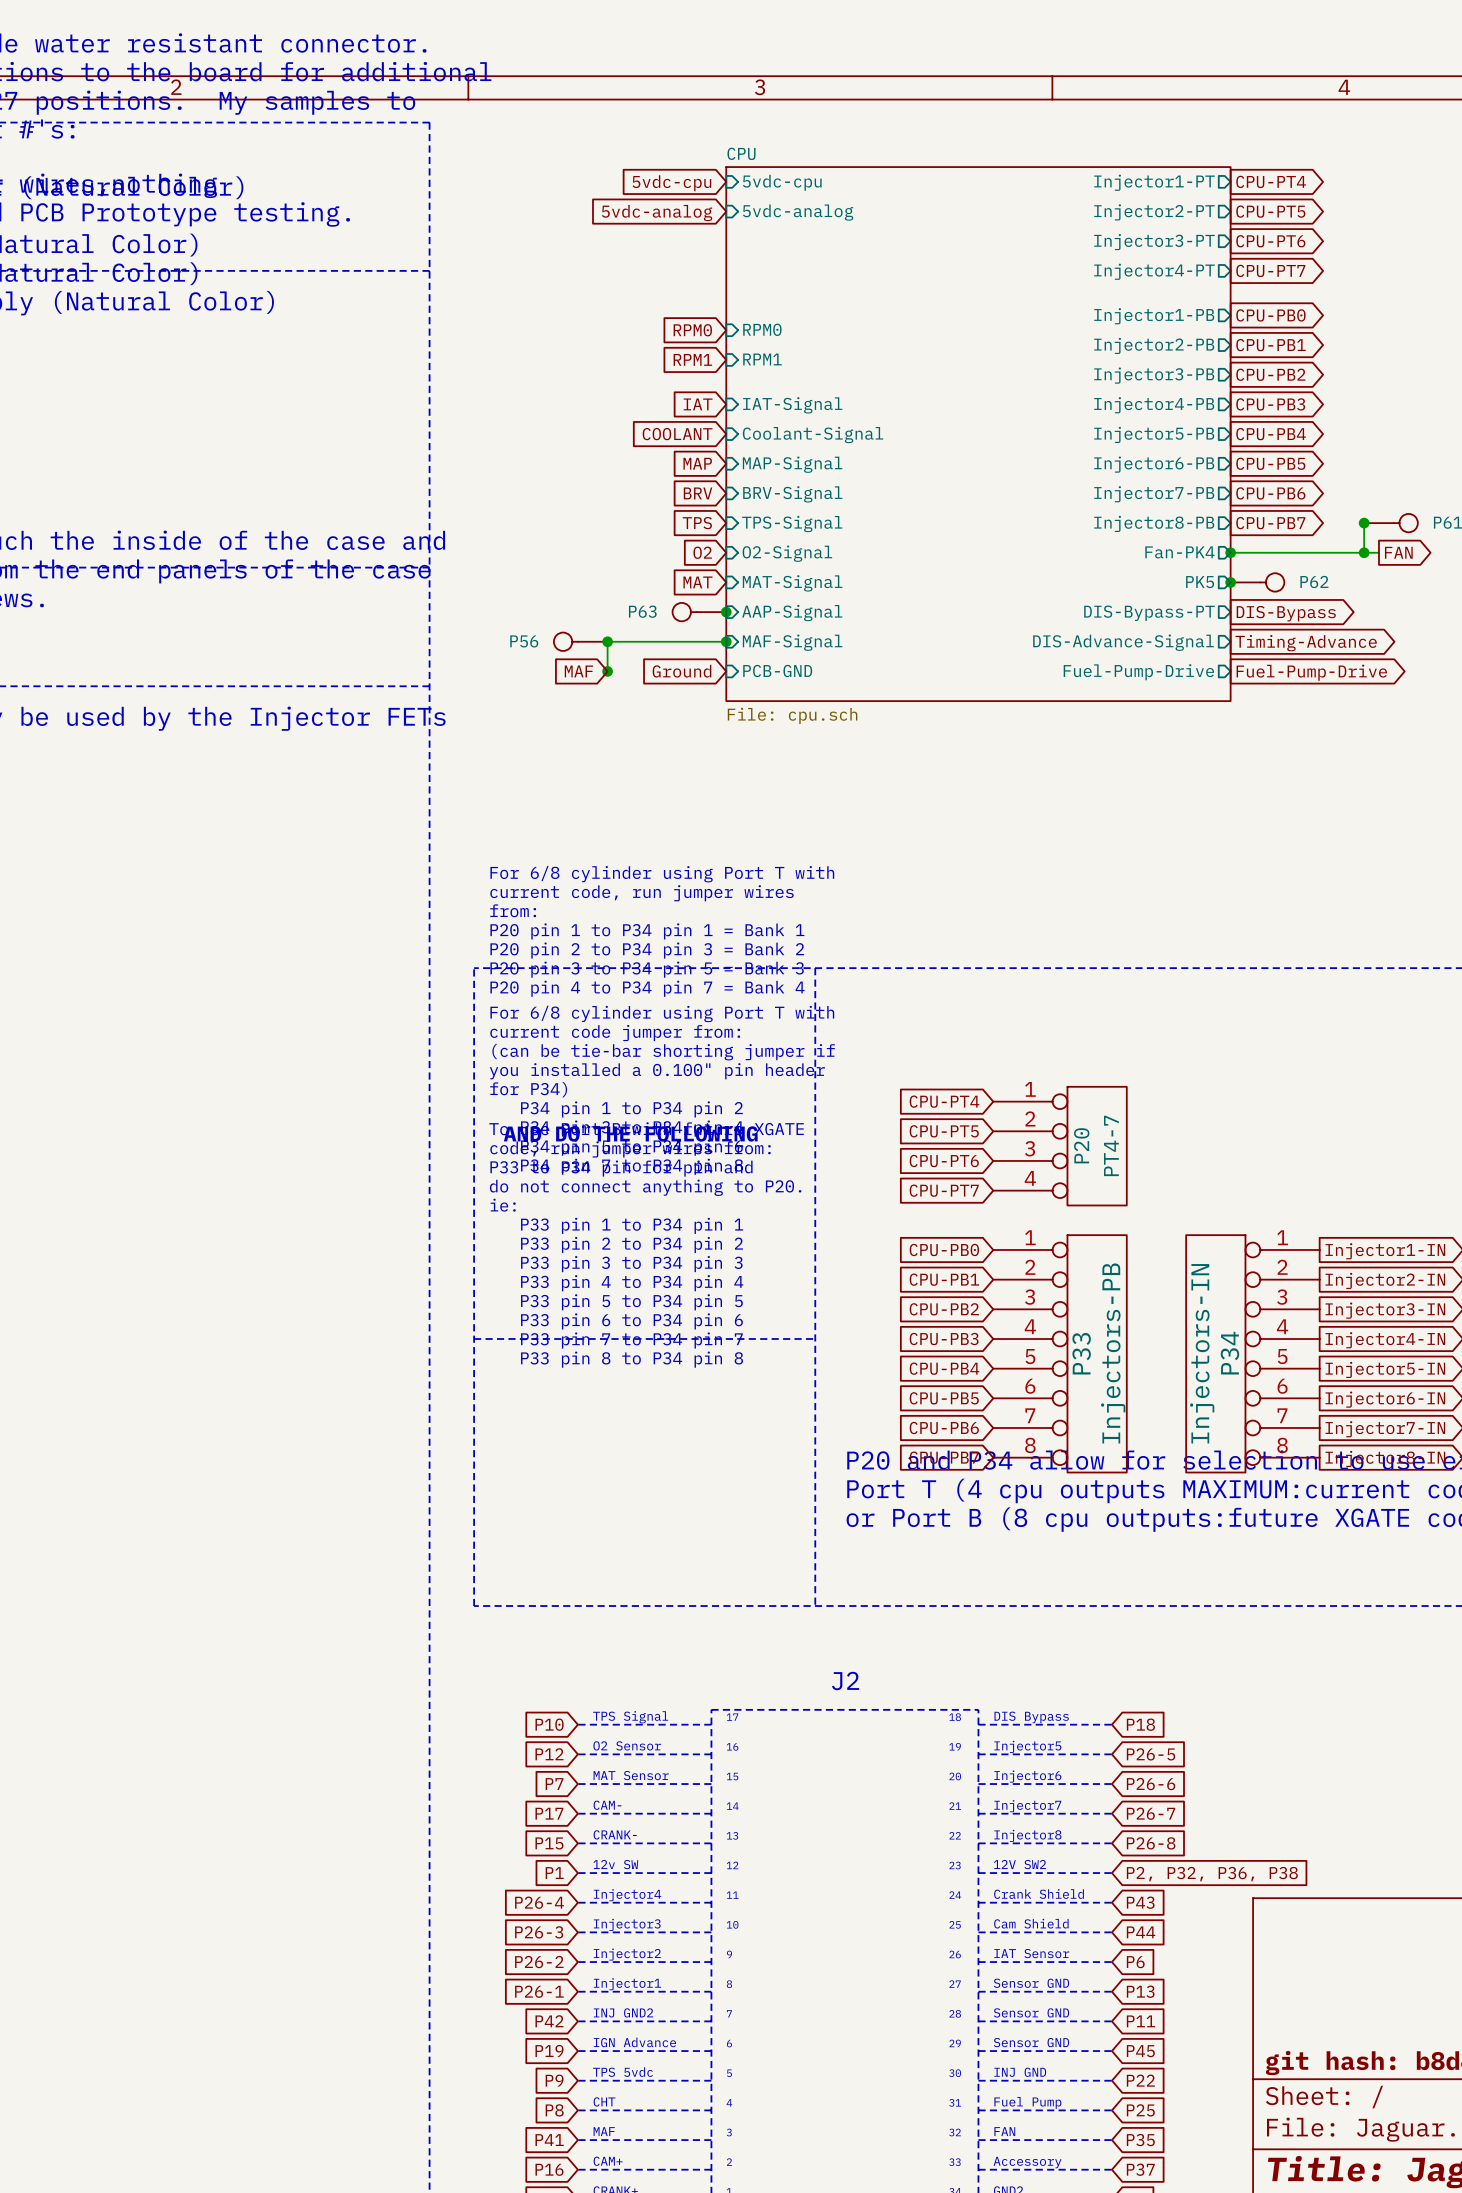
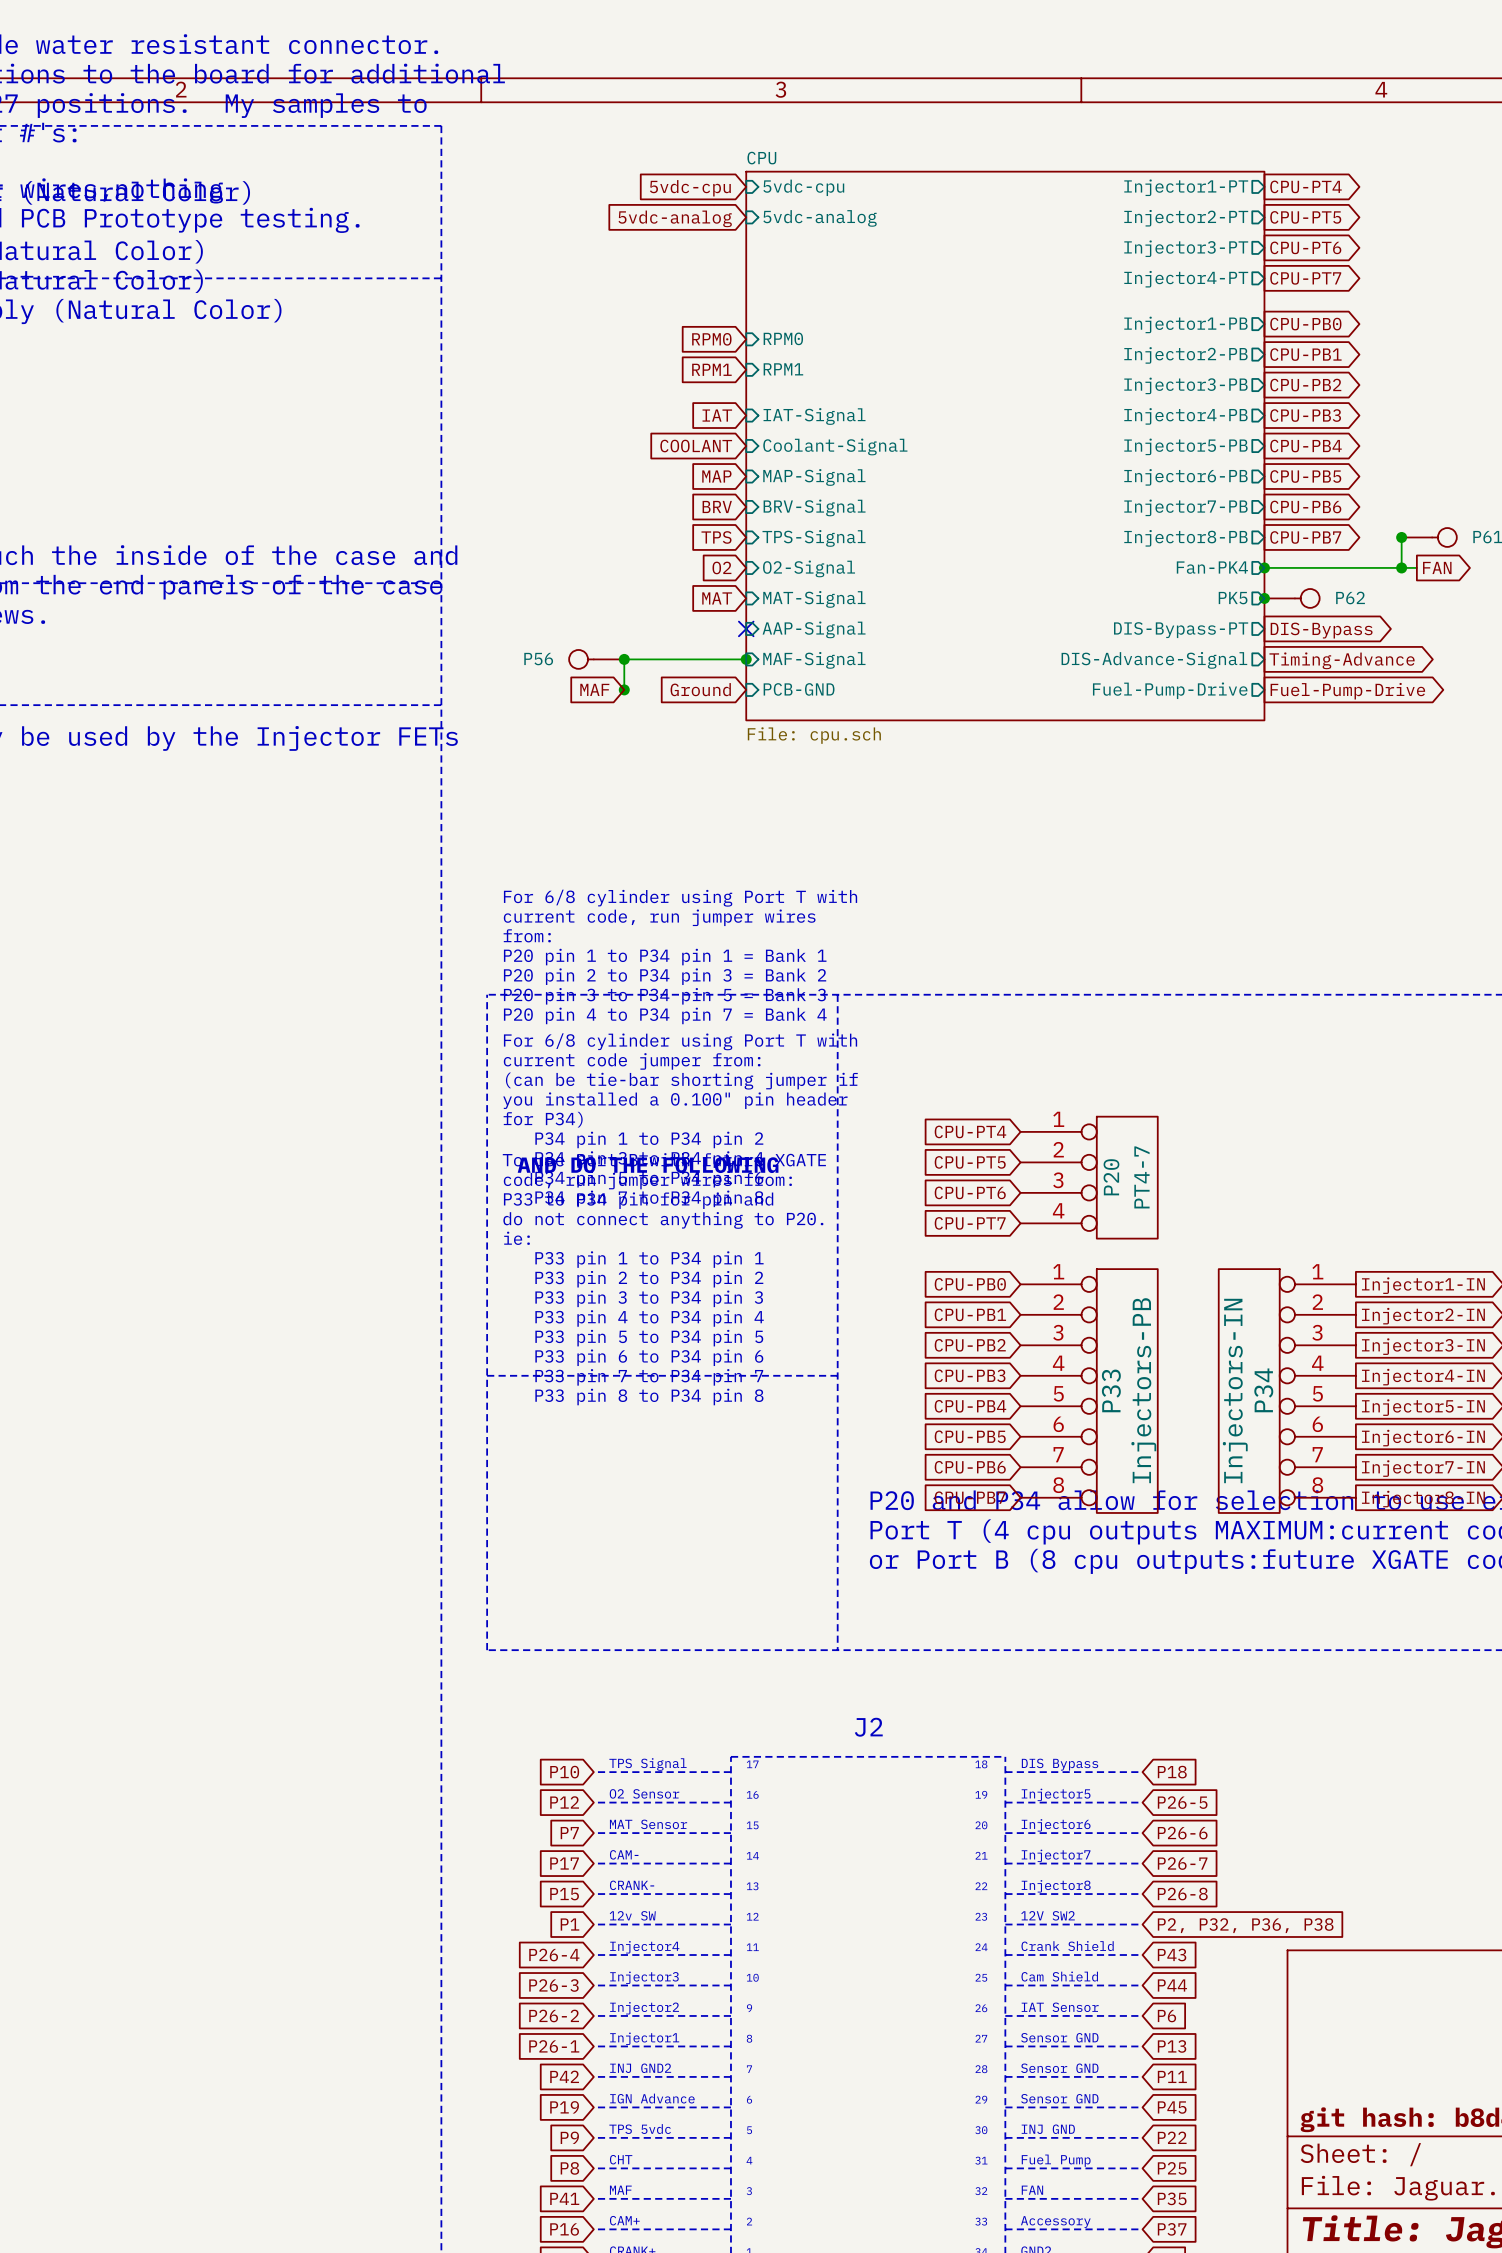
P63: (699, 612) -> none
junction: (726, 612) -> none
no-connect mark: none -> (746, 628)

